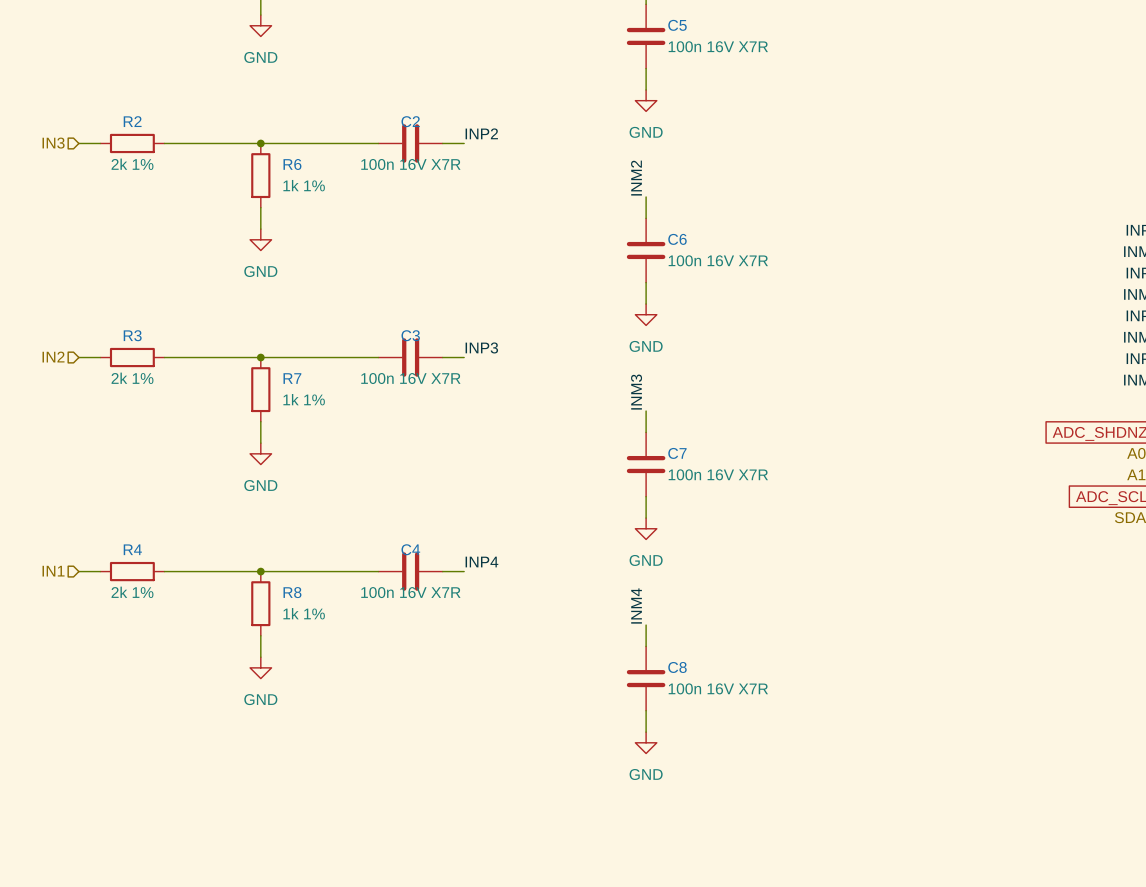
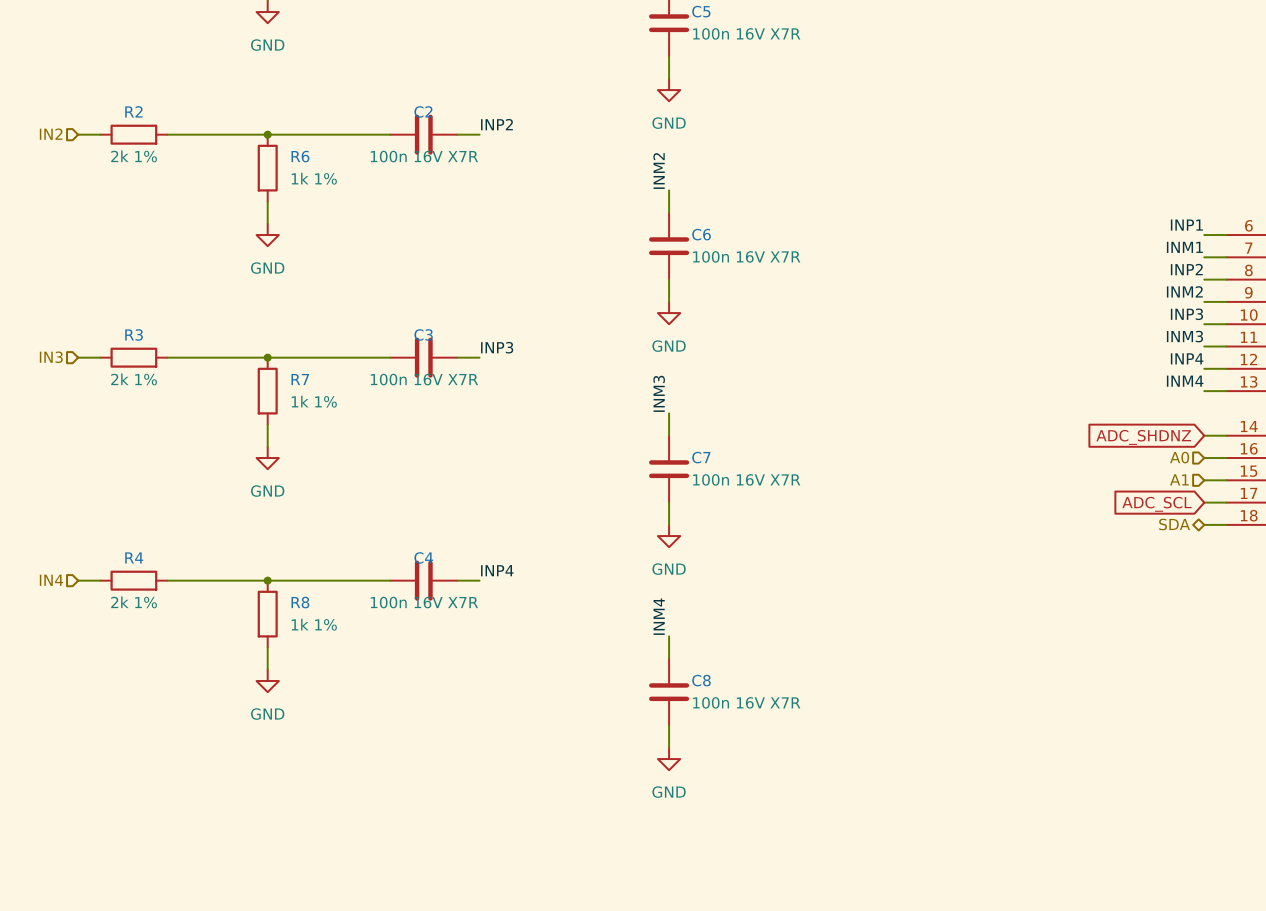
hierarchical label: IN3 (53, 143) -> IN2 (51, 134)
hierarchical label: IN2 (53, 357) -> IN3 (51, 357)
hierarchical label: IN1 (53, 571) -> IN4 (51, 580)

